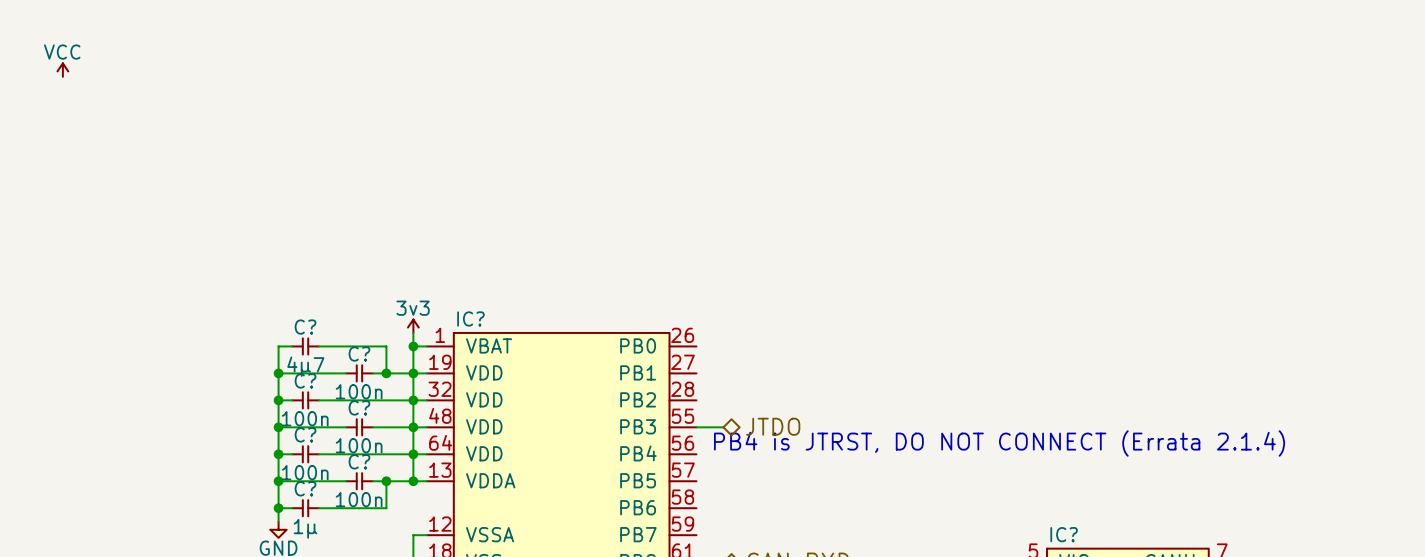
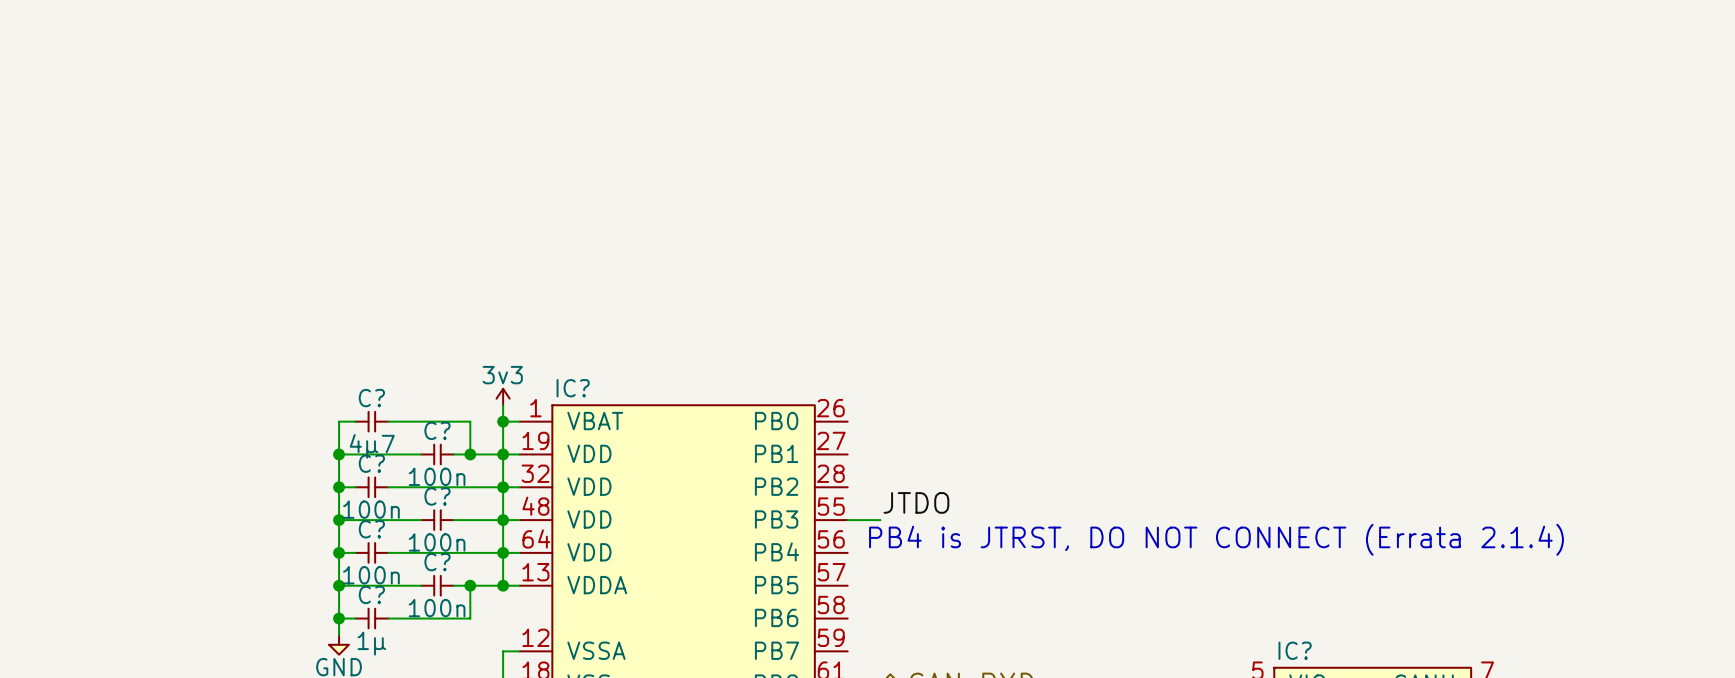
power symbol: VCC (62, 70) -> none
label: none -> JTDO (916, 502)
hierarchical label: JTDO (773, 426) -> none

